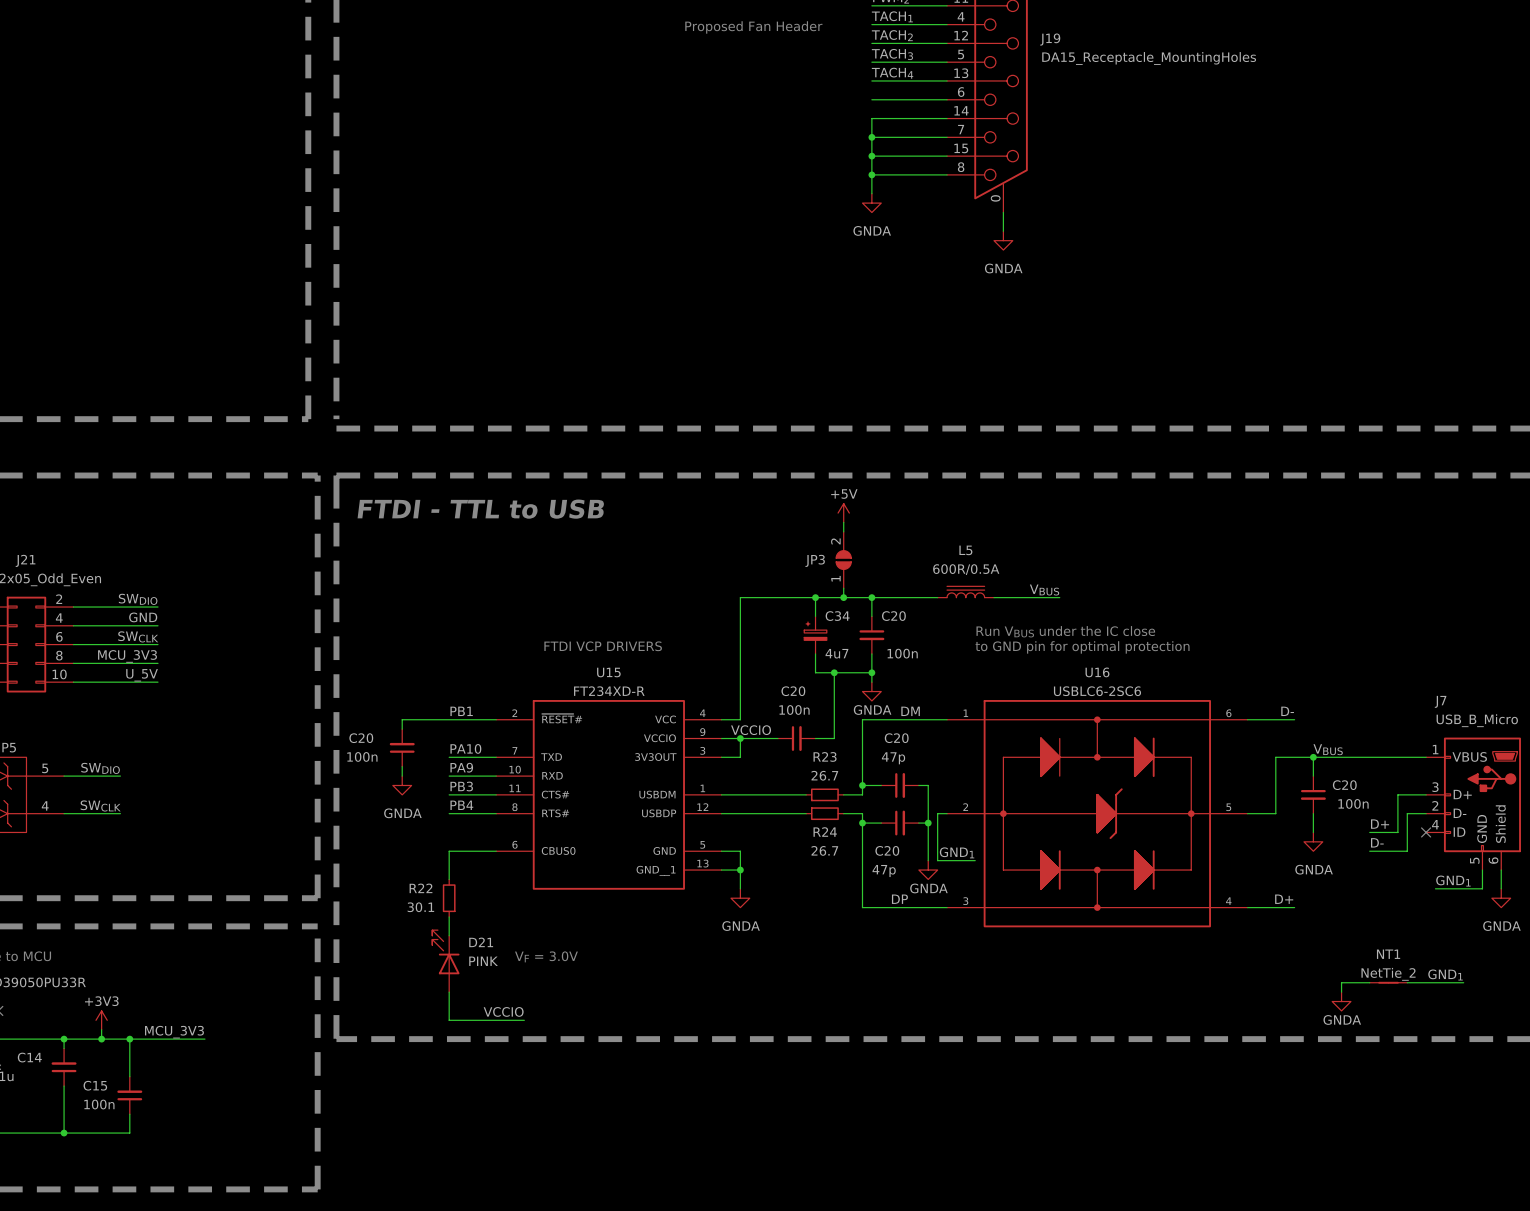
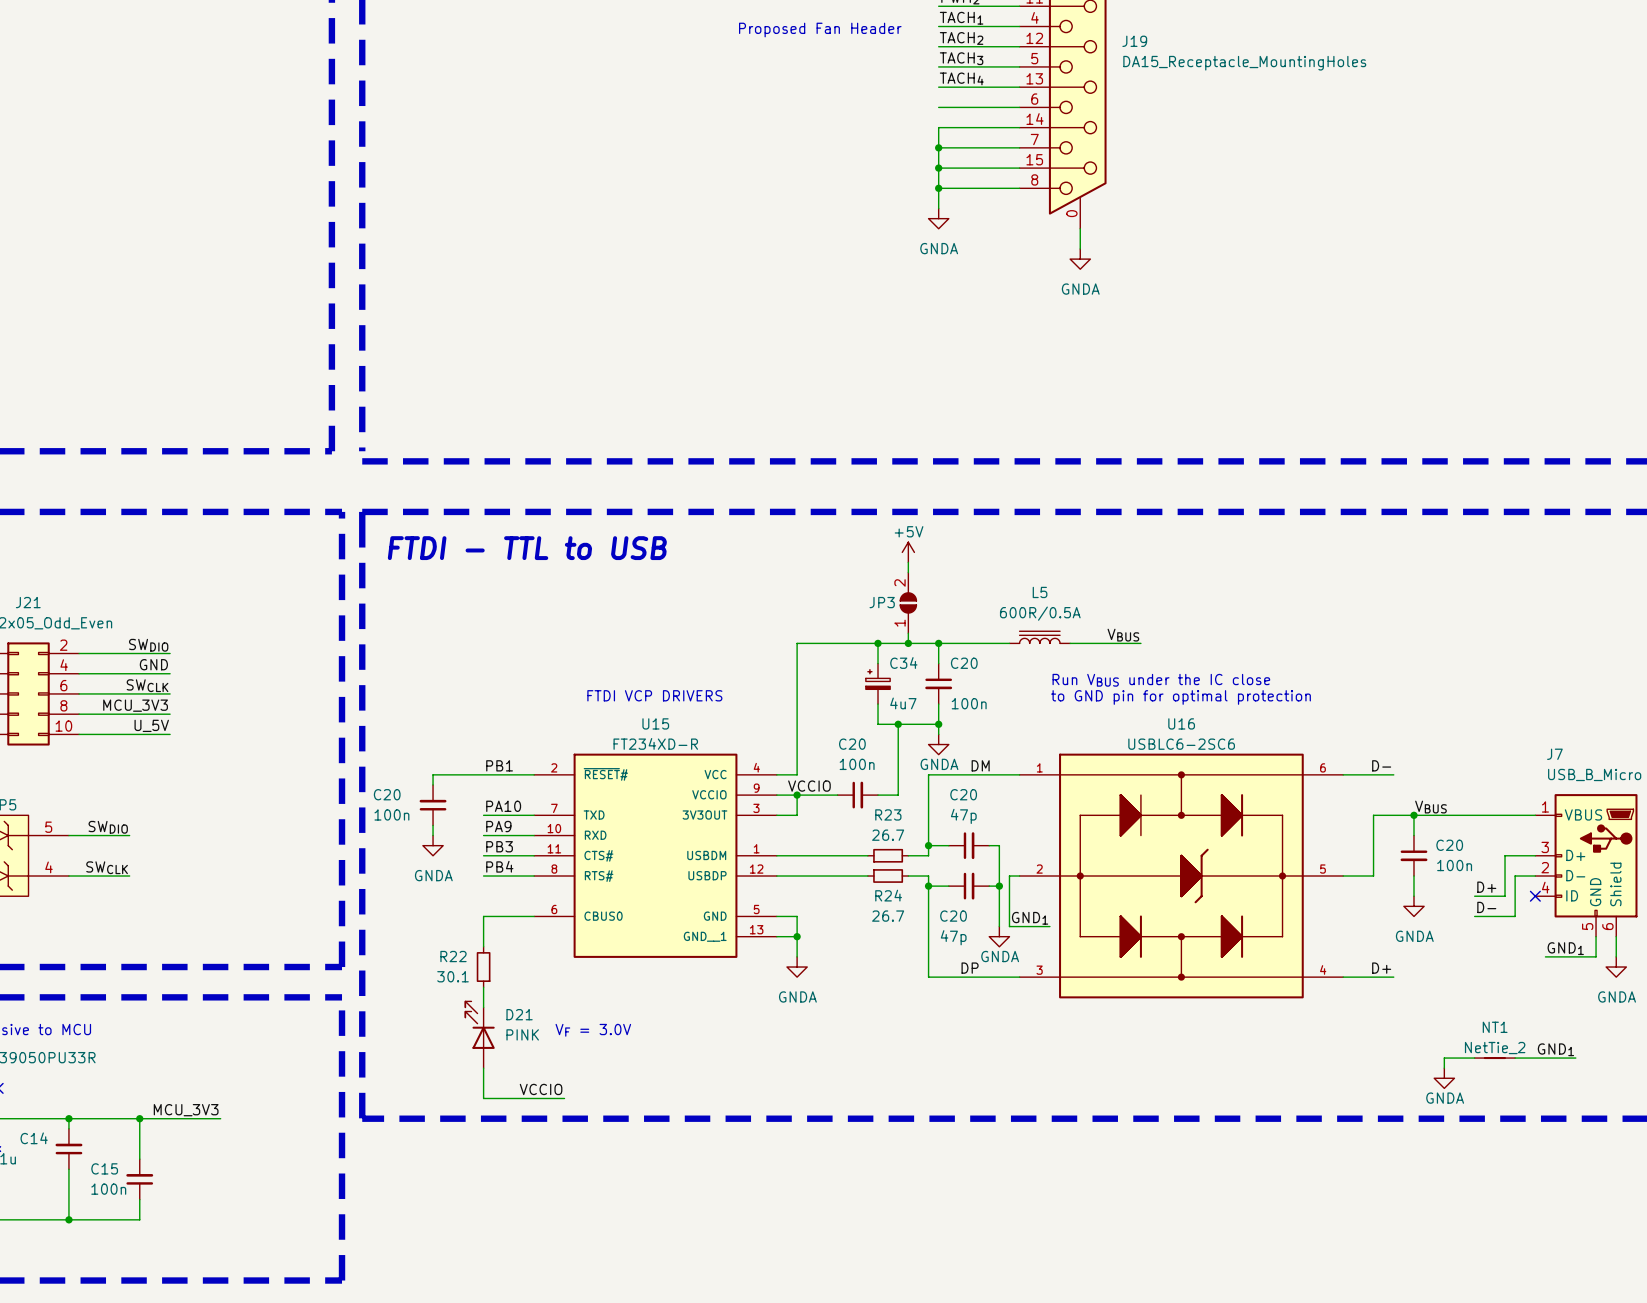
power symbol: +3V3 (101, 1020) -> none
wire: (101, 1029) (101, 1039) -> none
junction: (101, 1039) -> none

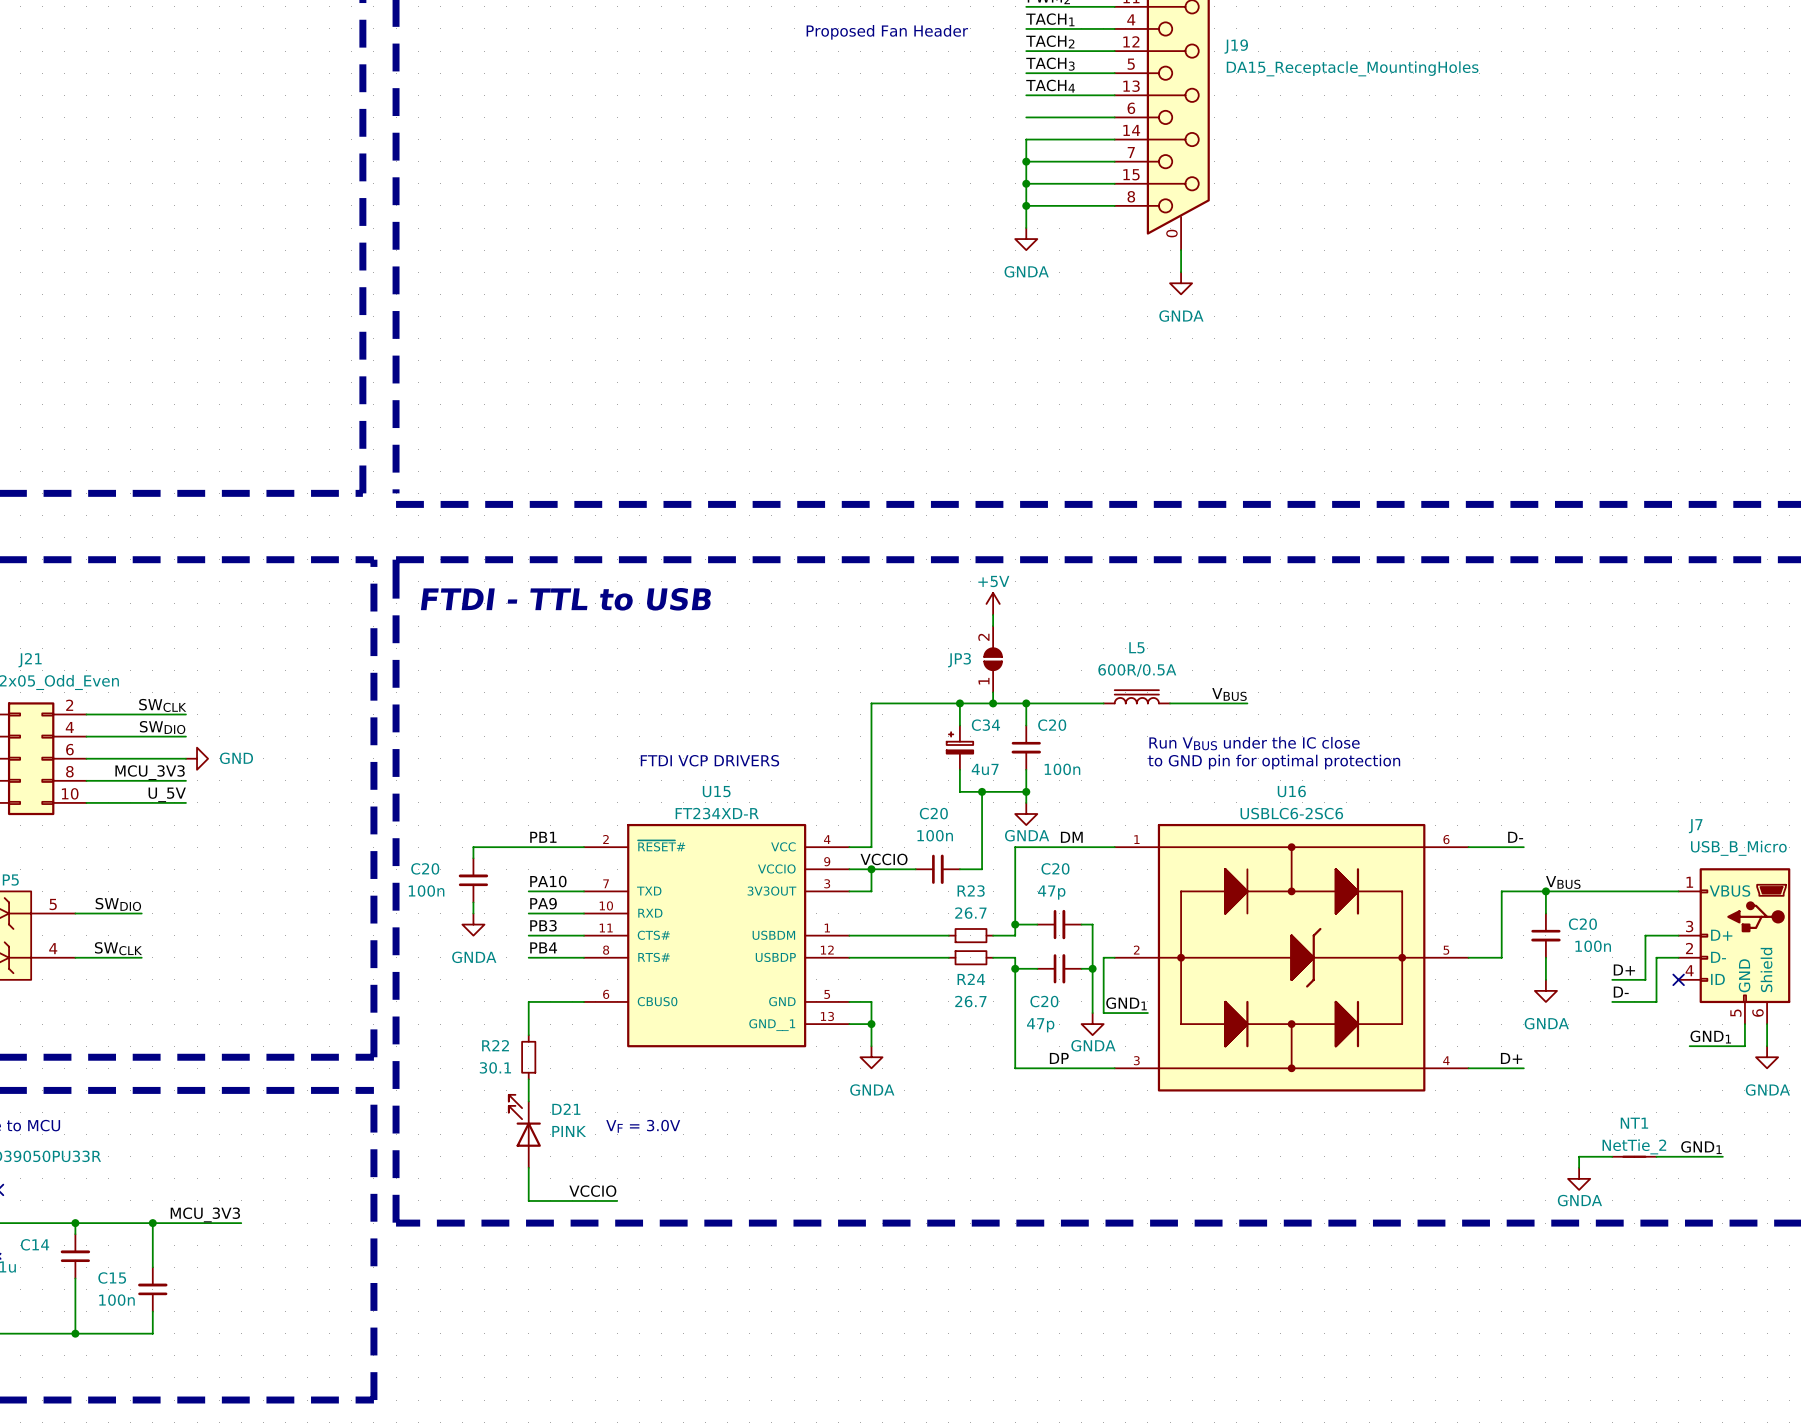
label: SWDIO (148, 645) -> SWCLK (162, 705)
label: GND (153, 664) -> SWDIO (162, 727)
label: SWCLK (147, 685) -> none
power symbol: none -> GND (197, 758)

